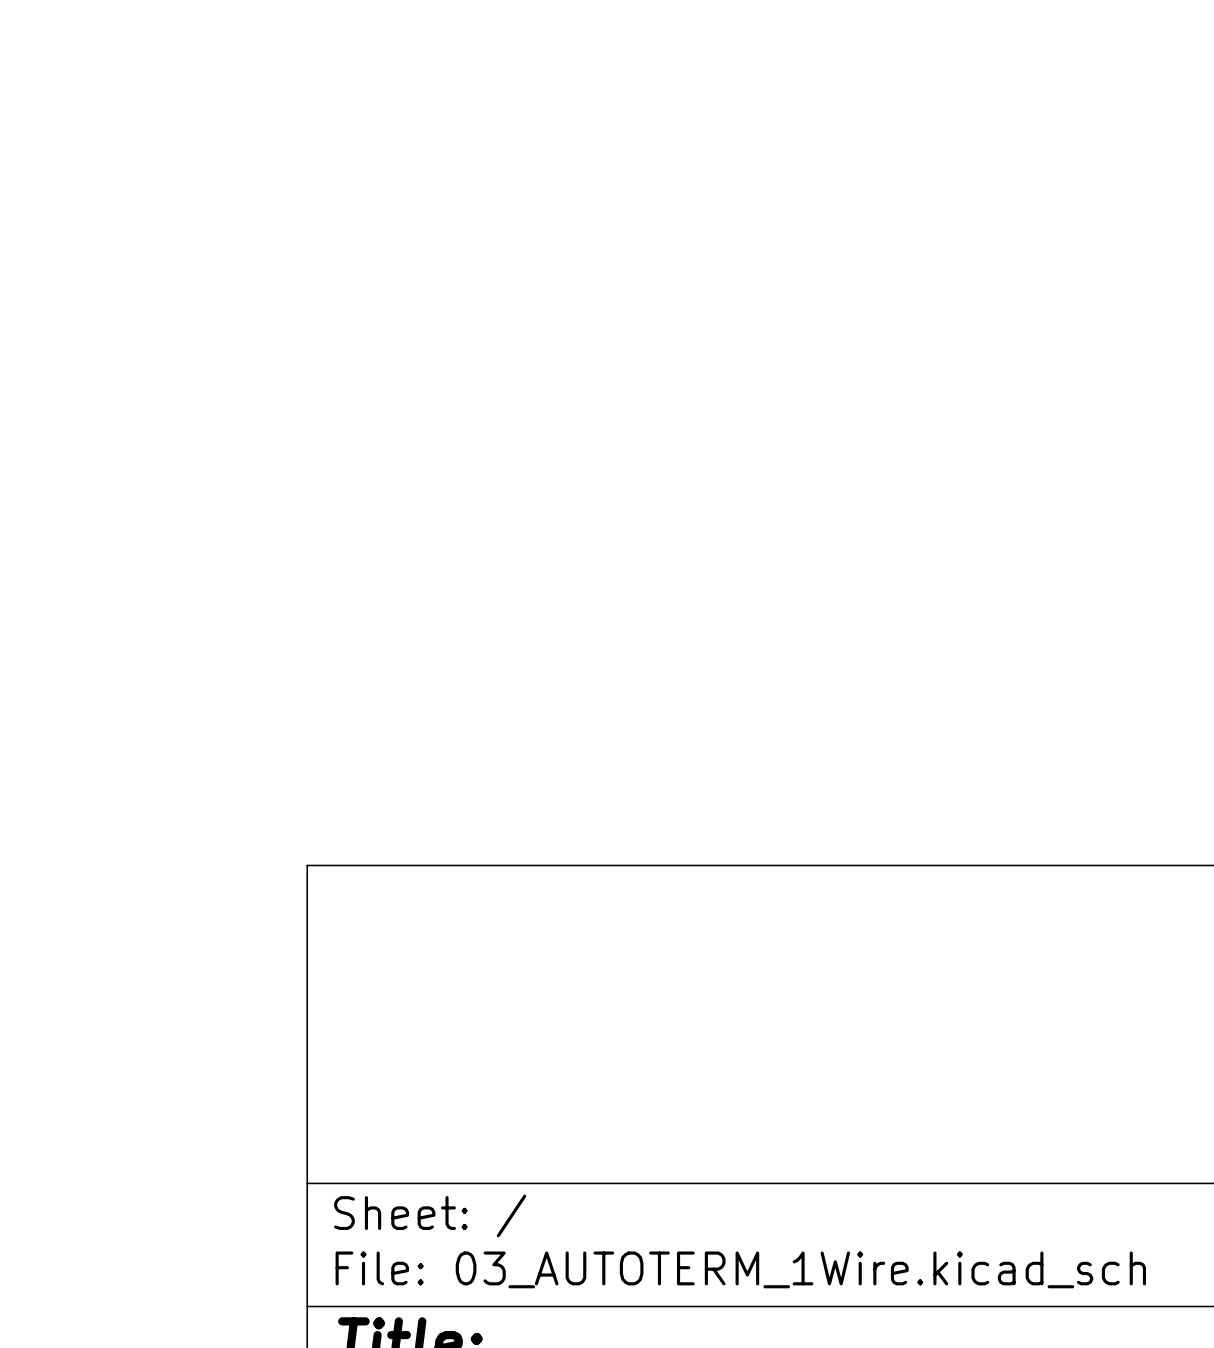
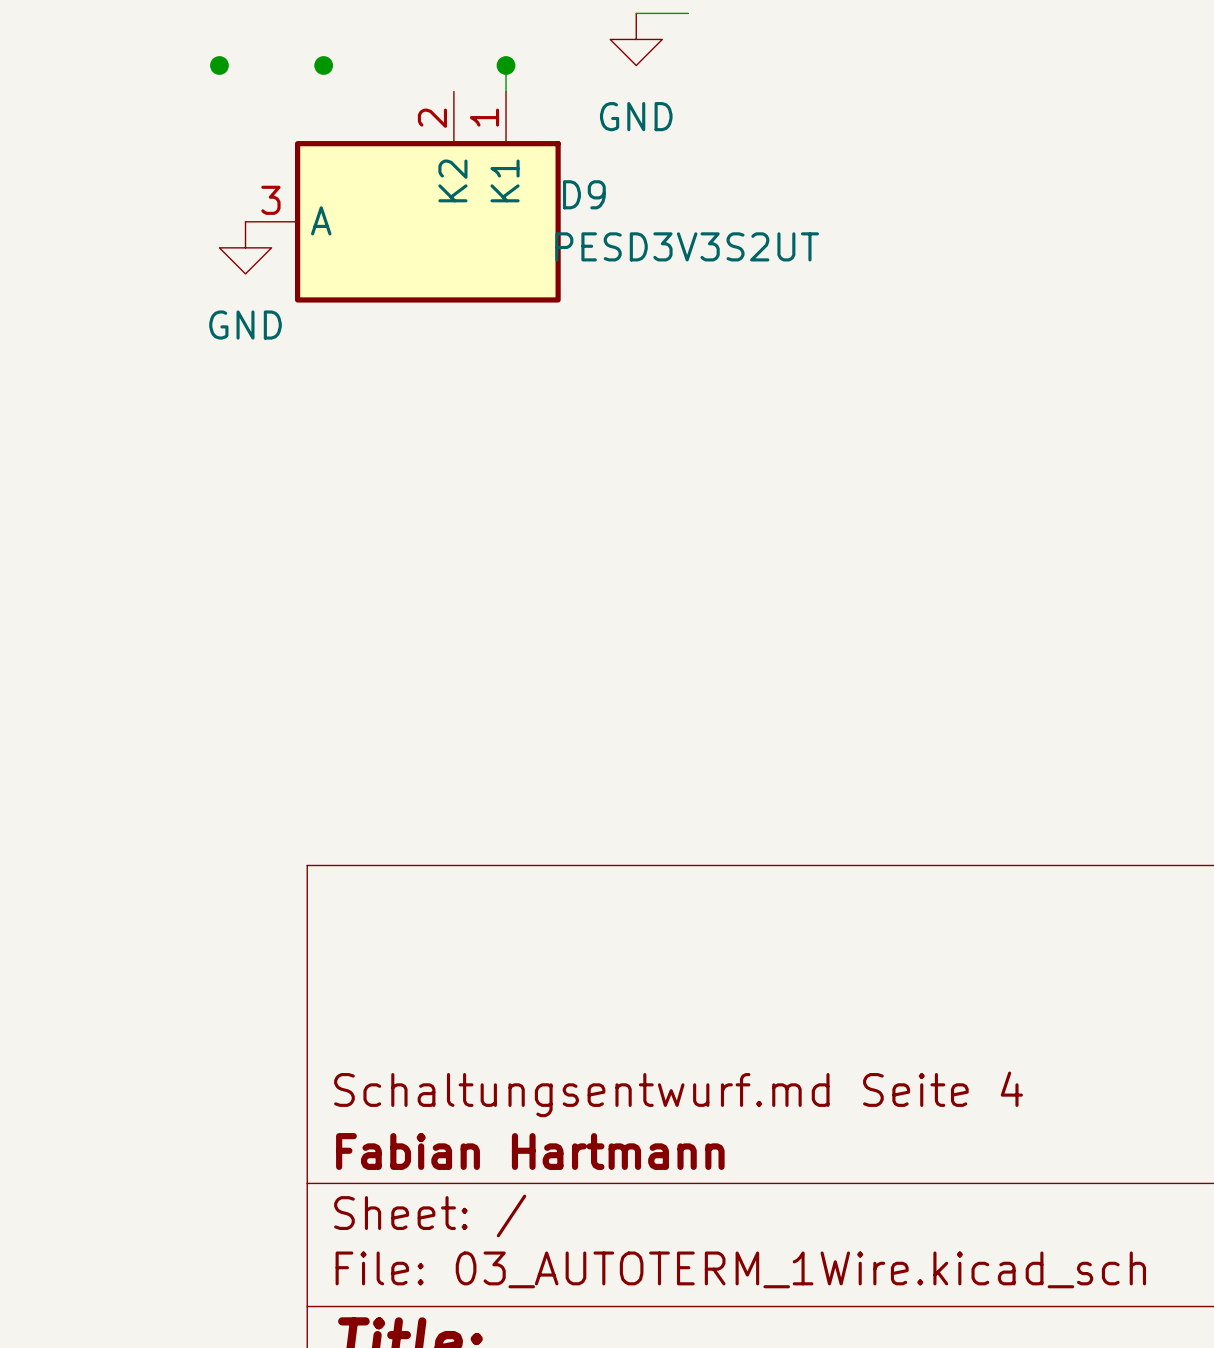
wire: none -> (636, 13) (688, 13)
power symbol: none -> GND (636, 39)
junction: none -> (219, 65)
junction: none -> (323, 65)
wire: none -> (506, 65) (506, 91)
junction: none -> (506, 65)
D9: none -> PESD3V3S2UT (403, 197)
power symbol: none -> GND (245, 247)
title block: none -> Schaltungsentwurf.md Seite 4 (678, 1094)
title block: none -> Fabian Hartmann (530, 1151)

